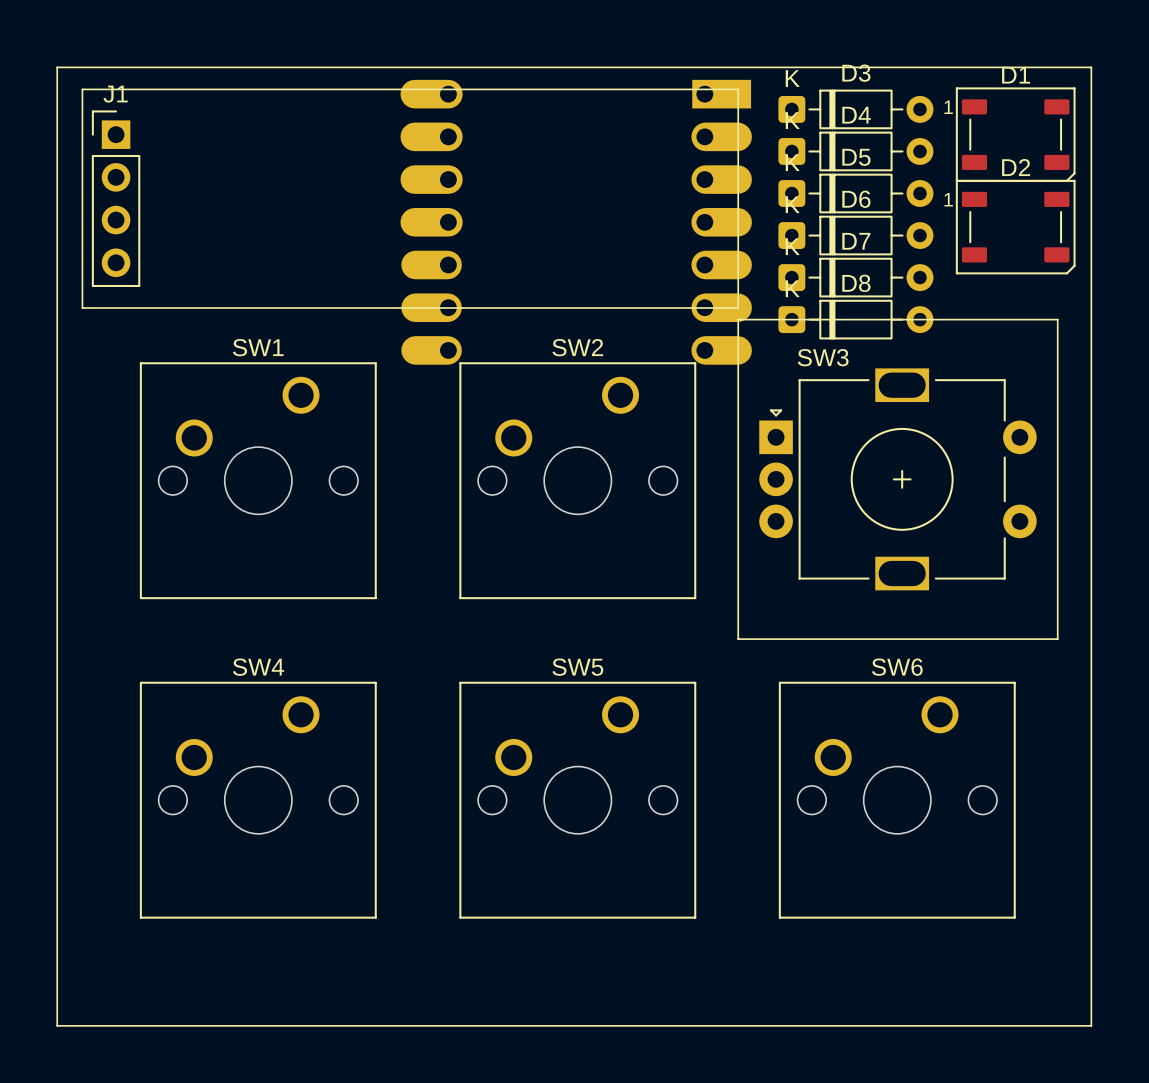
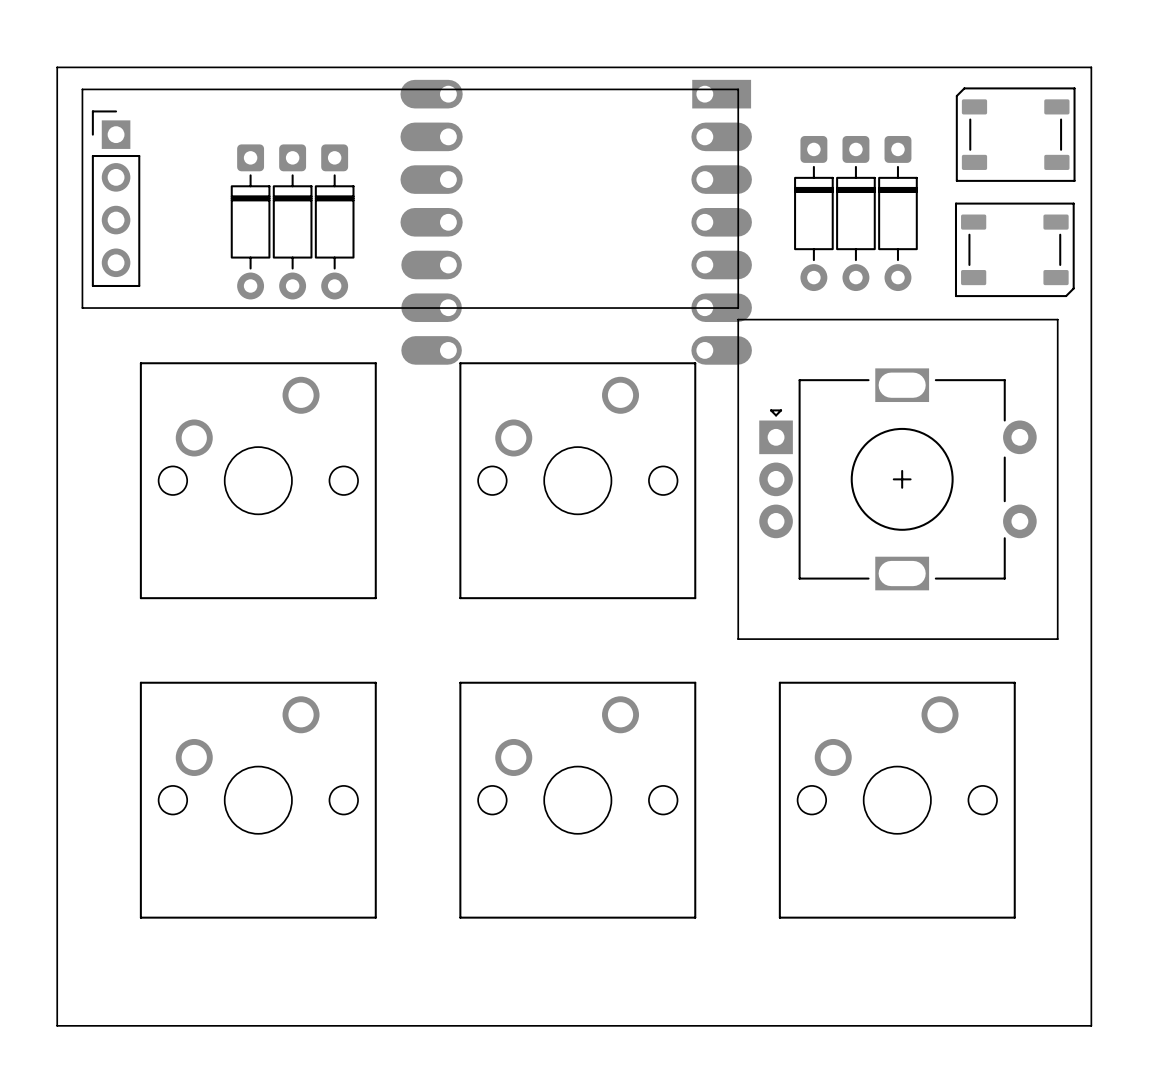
line: (57, 67) (1091, 67) (1091, 1025) (57, 1025) (57, 67) -> none
board edge: none -> (57, 67) (1091, 67) (1091, 1025) (57, 1025) (57, 67)
J1 name: J1 (115, 94) -> none
D3: (855, 109) -> none
D1: (1015, 134) -> none
part: none -> (1015, 134)
D4: (855, 151) -> none
D5: (855, 193) -> none
part: none -> (813, 213)
part: none -> (855, 213)
part: none -> (897, 213)
part: none -> (250, 221)
part: none -> (292, 221)
part: none -> (334, 221)
D2: (1015, 227) -> none
D6: (855, 235) -> none
part: none -> (1014, 249)
D7: (855, 277) -> none
D8: (855, 319) -> none
SW1 name: SW1 (258, 347) -> none
SW2 name: SW2 (577, 347) -> none
SW3 name: SW3 (823, 357) -> none
SW4 name: SW4 (258, 667) -> none
SW5 name: SW5 (577, 667) -> none
SW6 name: SW6 (897, 667) -> none

